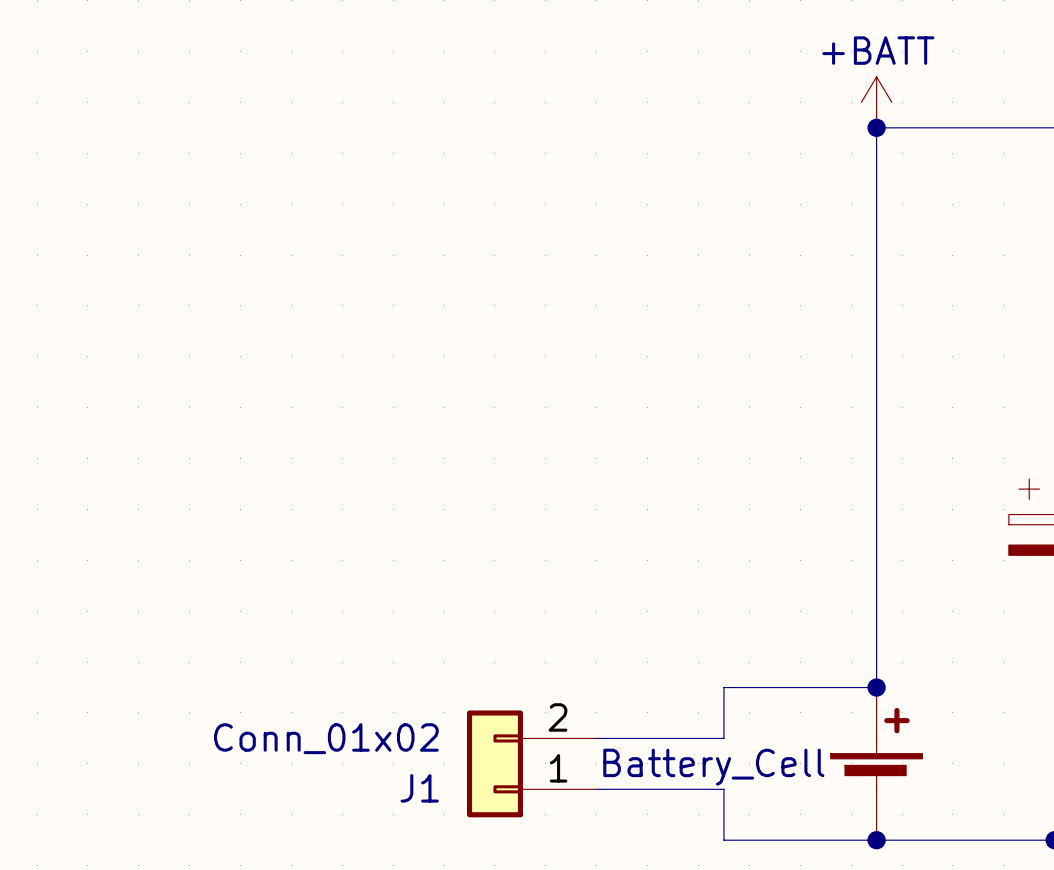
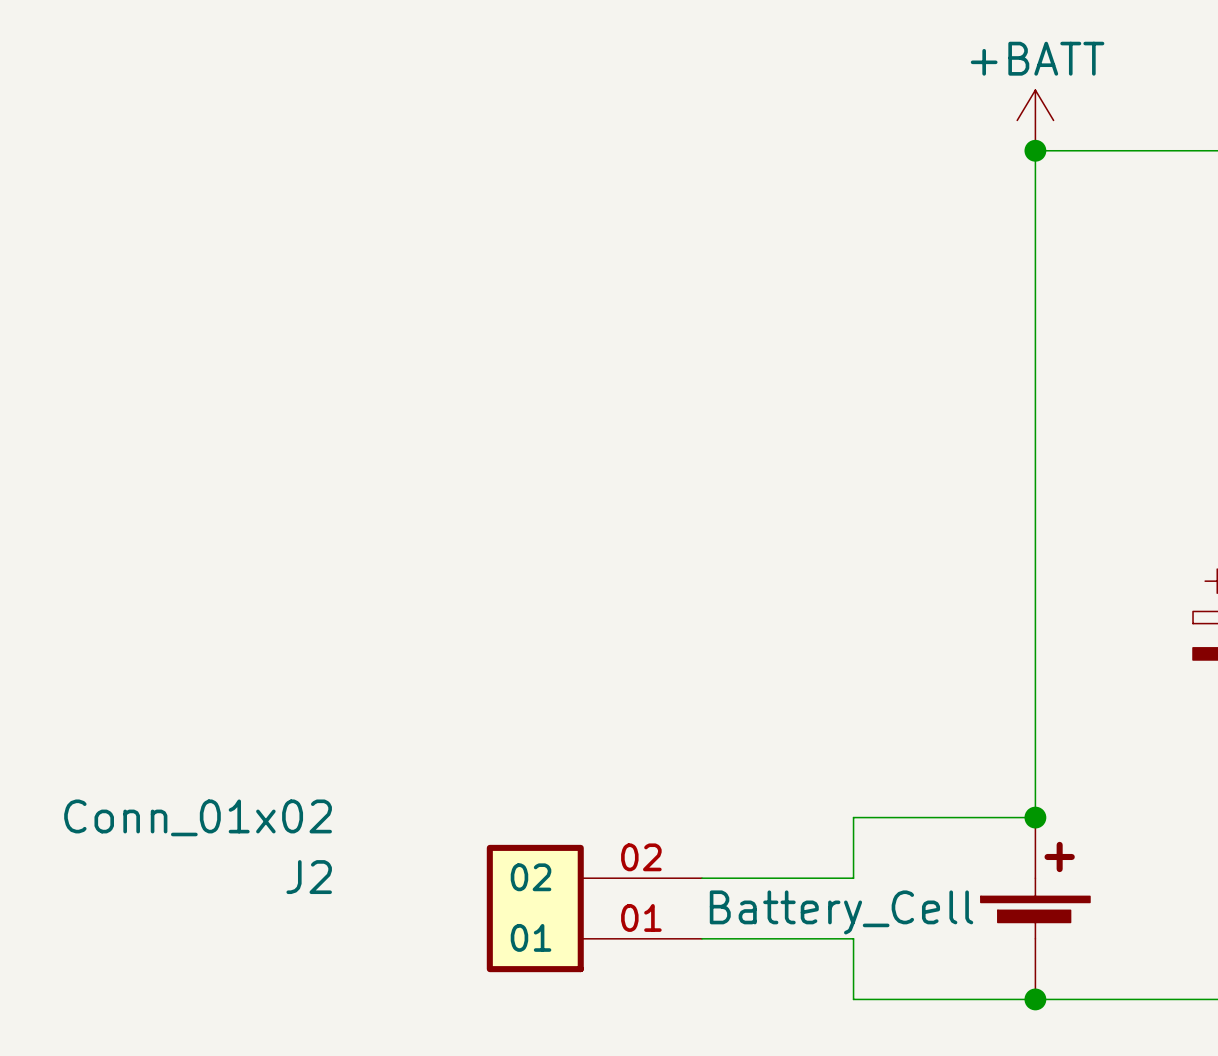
J2: none -> Conn_01x02 (594, 908)
J1: Conn_01x02 (531, 763) -> none

